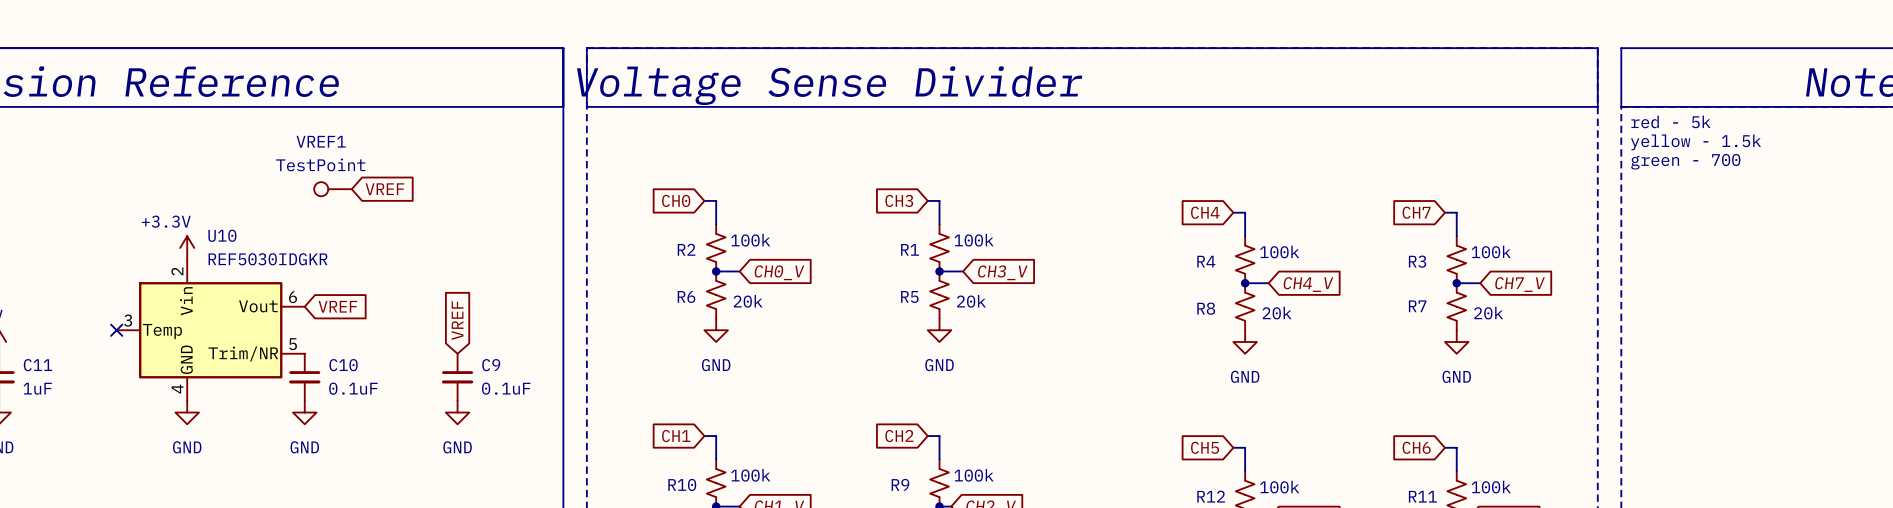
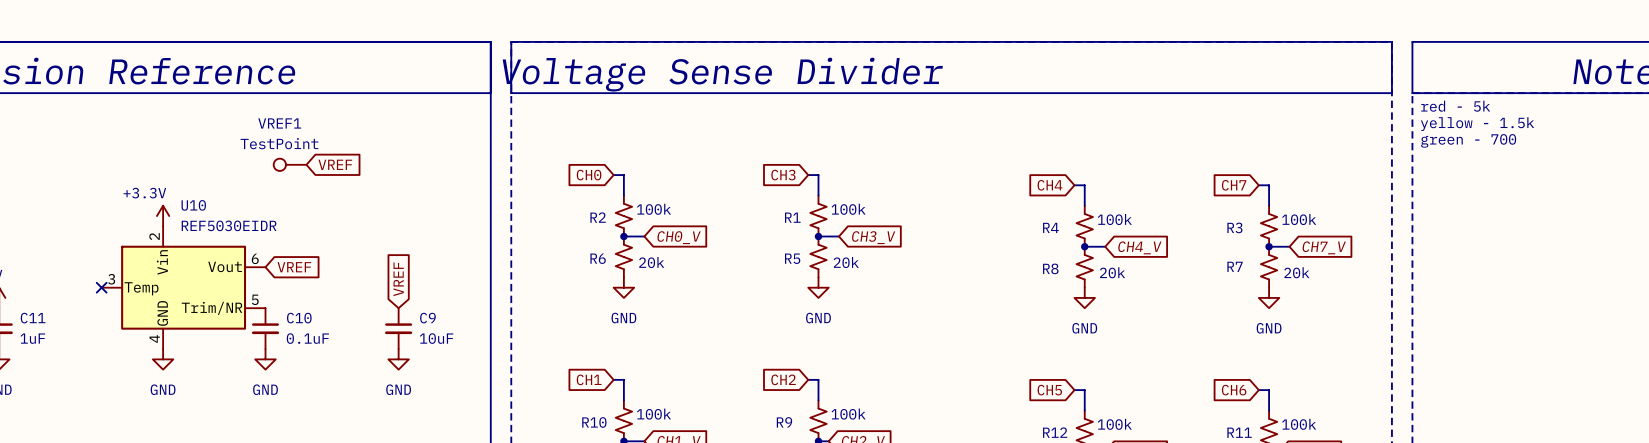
U10 value: REF5030IDGKR (268, 259) -> REF5030EIDR (229, 225)
C9 value: 0.1uF (506, 388) -> 10uF (436, 338)

